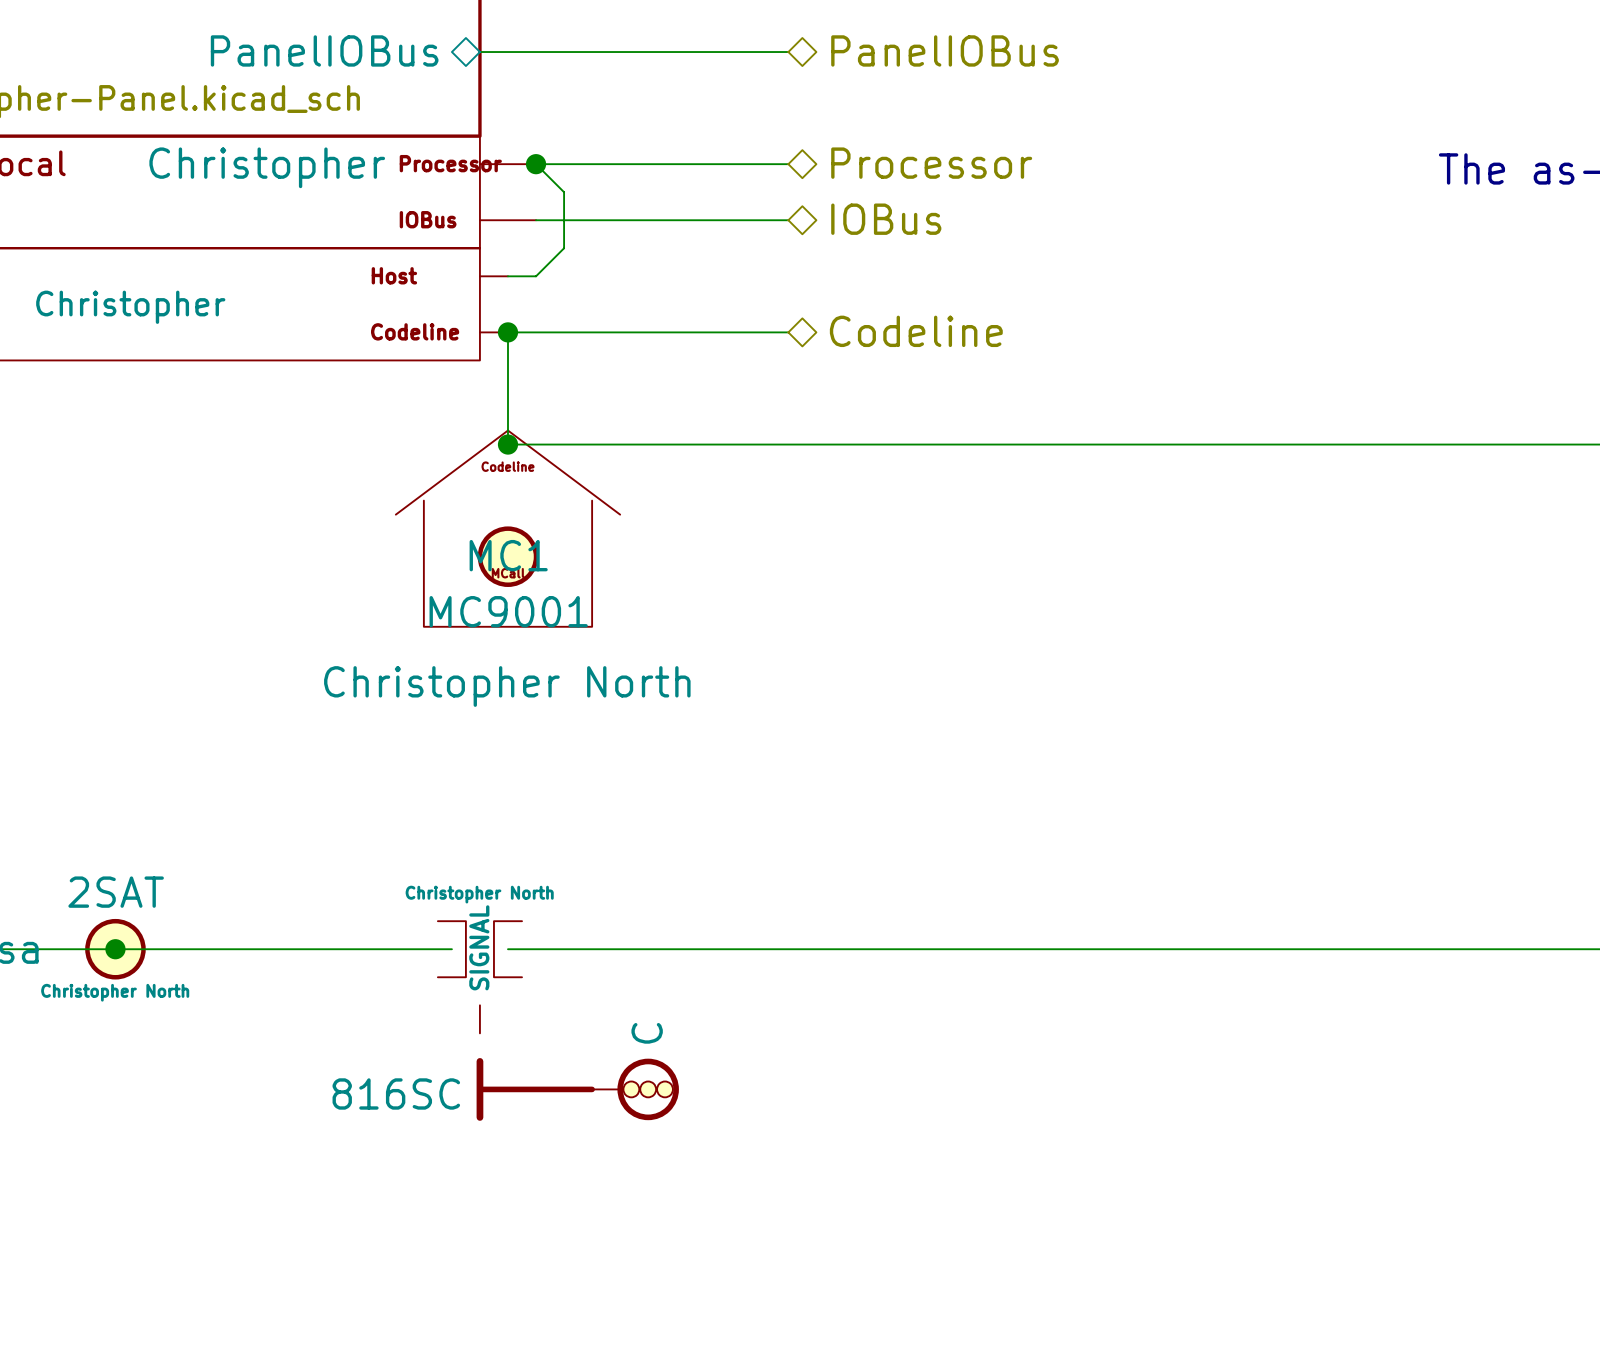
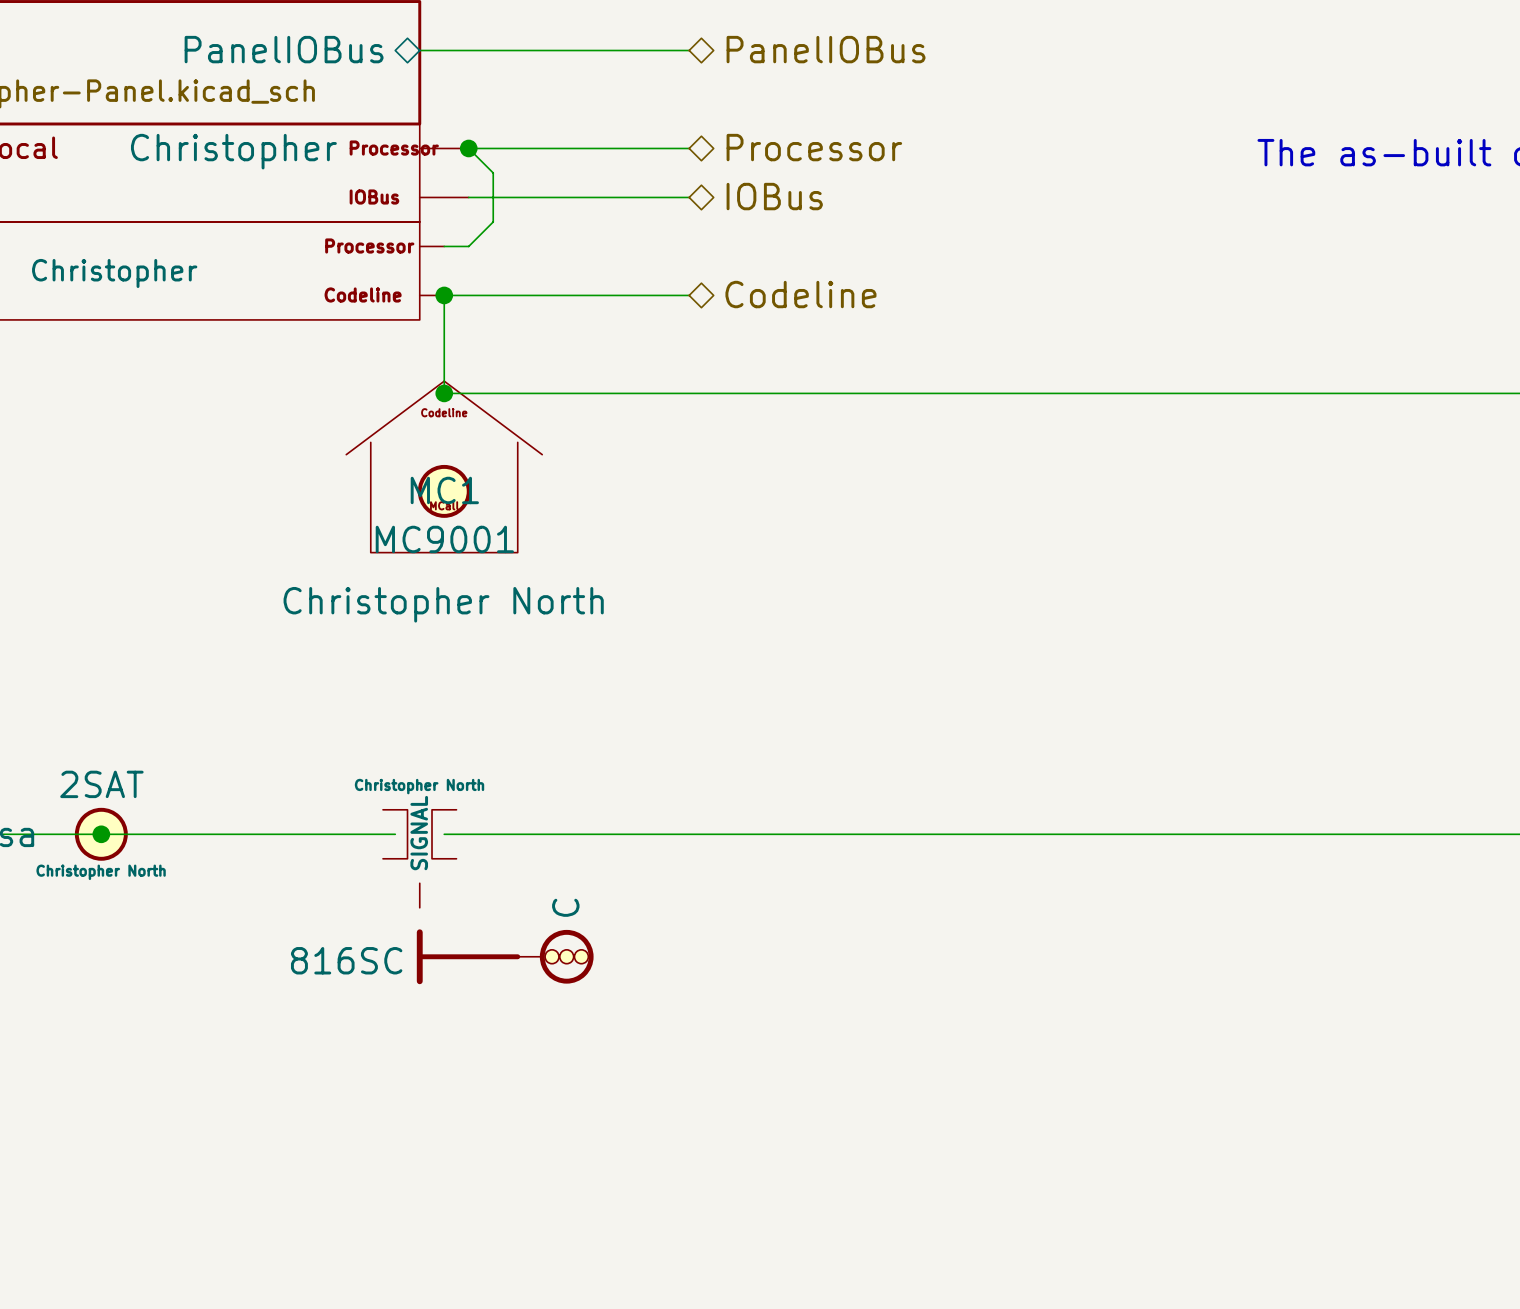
part text: Host (394, 275) -> Processor (369, 246)

